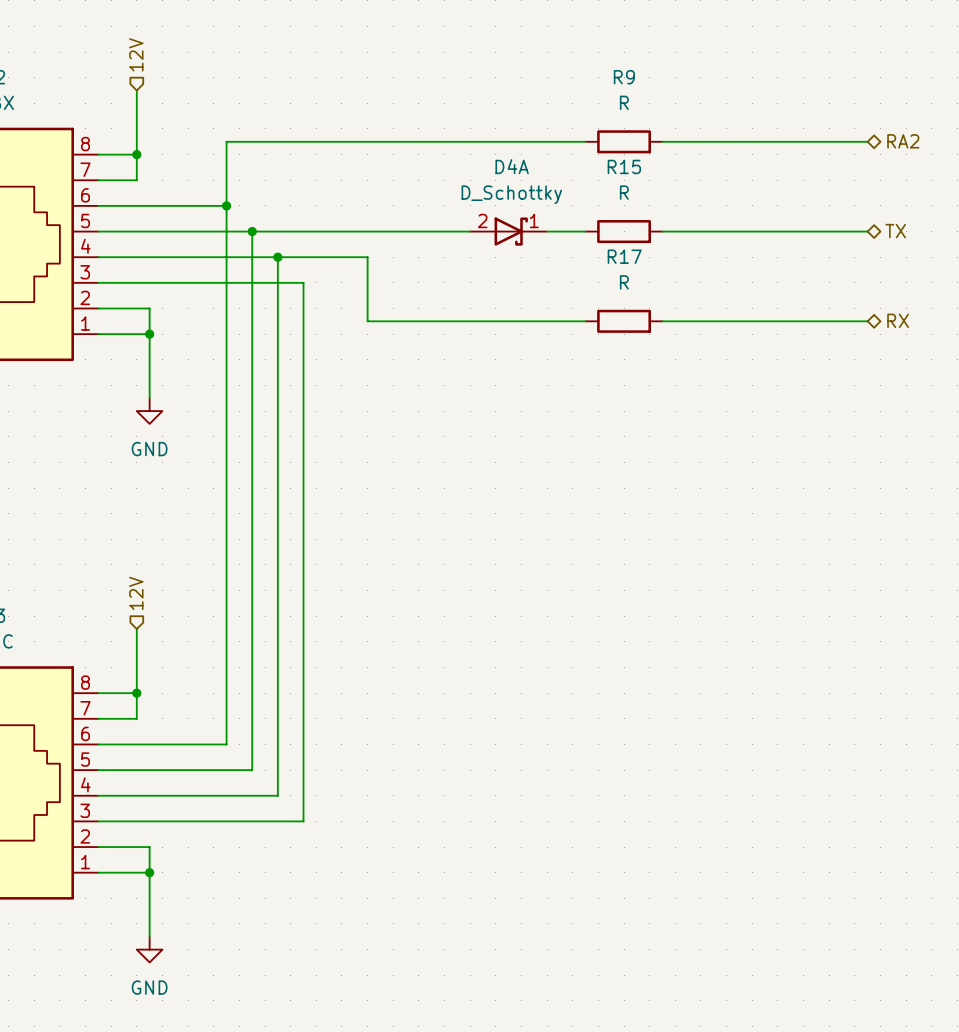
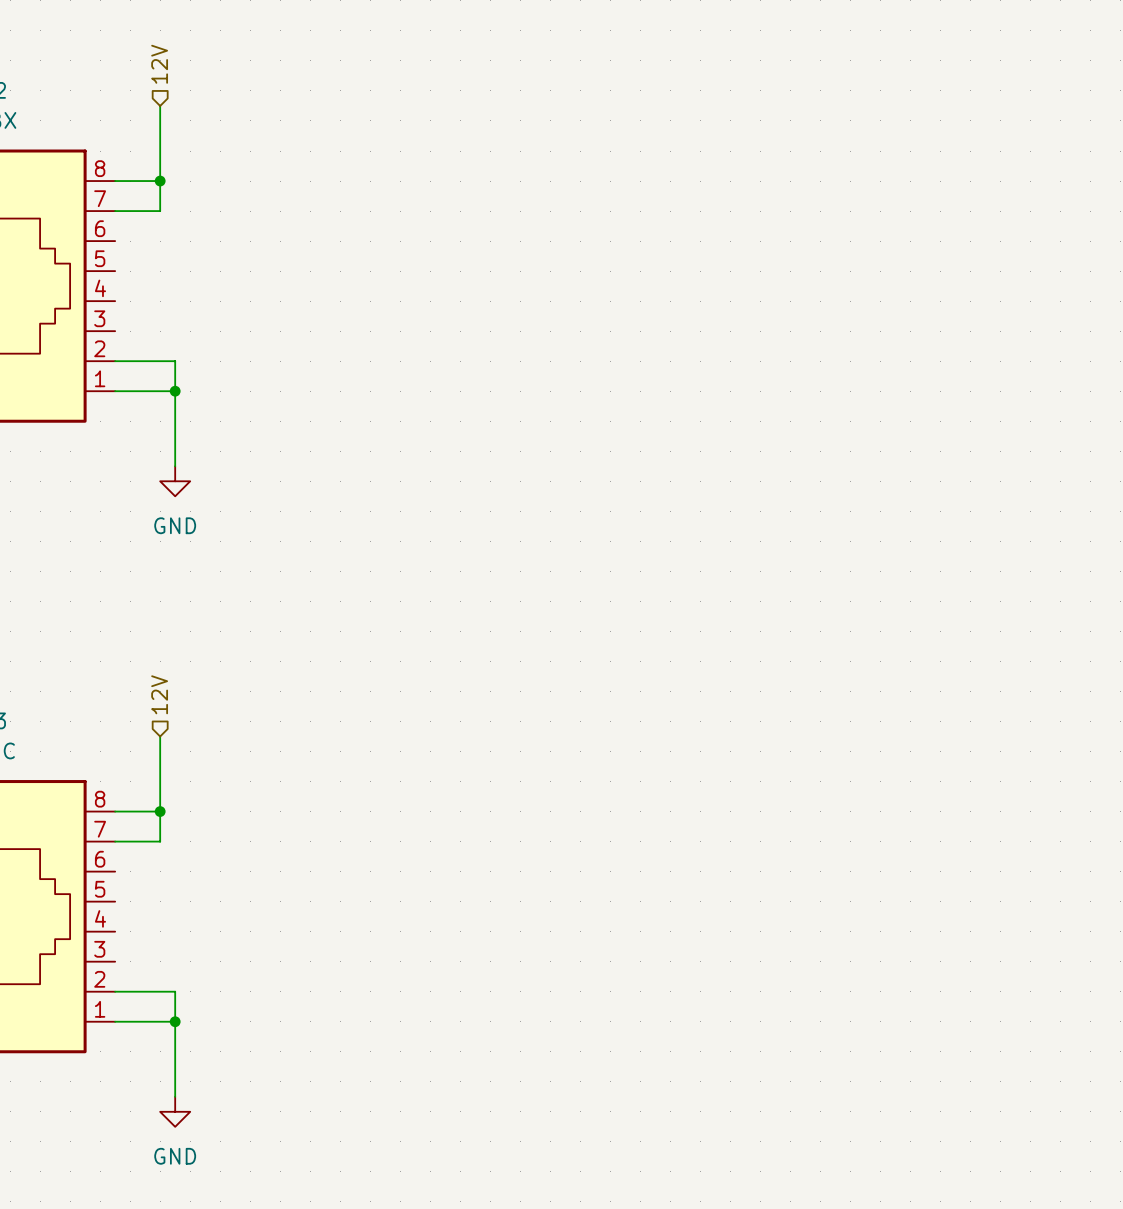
wire: (585, 141) (226, 141) (226, 744) (98, 744) -> none
R9: R (624, 141) -> none
wire: (662, 141) (867, 141) -> none
hierarchical label: RA2 (903, 141) -> none
wire: (98, 205) (226, 205) -> none
junction: (226, 205) -> none
wire: (98, 231) (470, 231) -> none
wire: (252, 231) (252, 770) (98, 770) -> none
junction: (252, 231) -> none
D4A: D_Schottky (508, 231) -> none
wire: (547, 231) (585, 231) -> none
R15: R (624, 231) -> none
wire: (662, 231) (867, 231) -> none
hierarchical label: TX (895, 231) -> none
wire: (98, 257) (367, 257) (367, 321) (585, 321) -> none
wire: (277, 257) (277, 795) (98, 795) -> none
junction: (277, 257) -> none
wire: (98, 282) (303, 282) (303, 821) (98, 821) -> none
hierarchical label: RX (898, 320) -> none
R17: R (624, 321) -> none
wire: (662, 321) (867, 321) -> none

